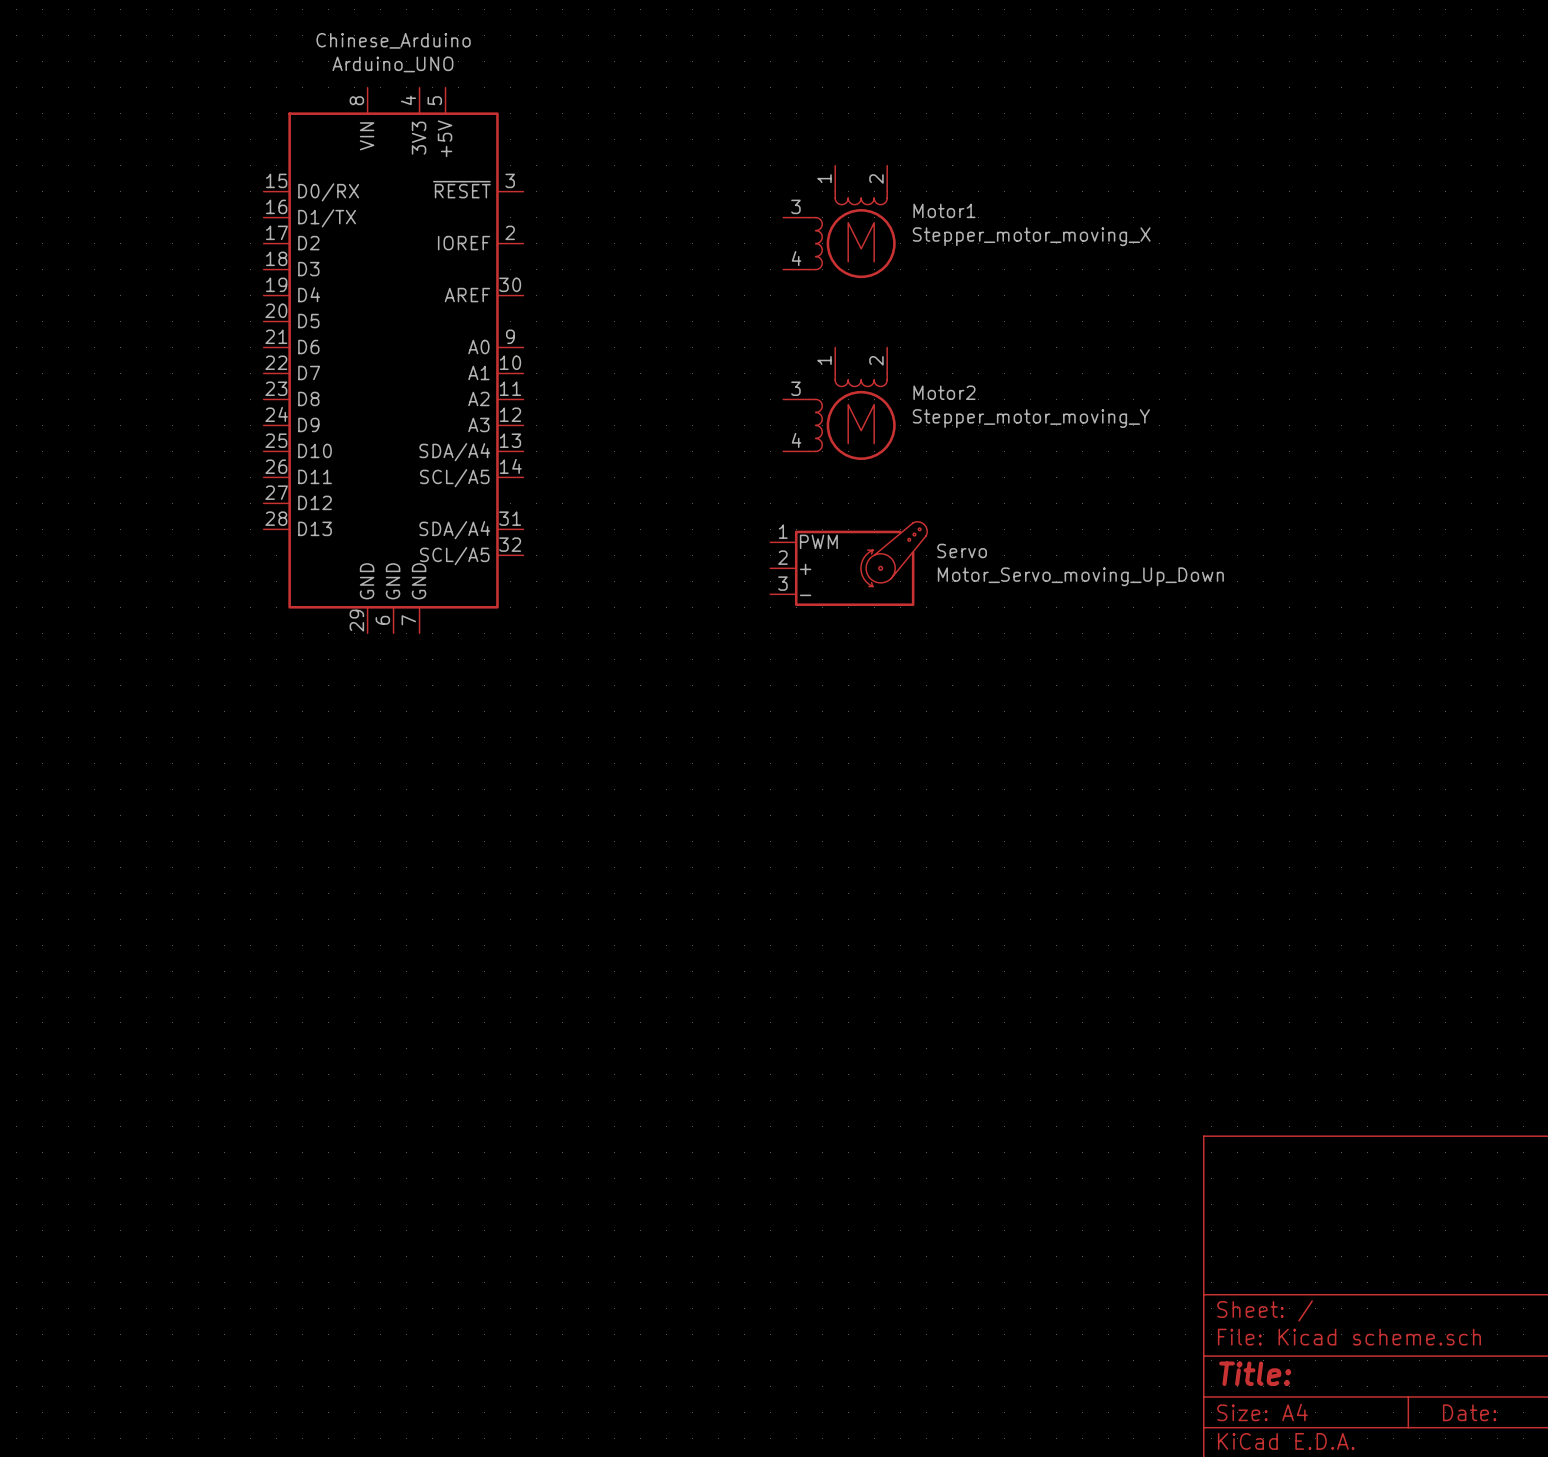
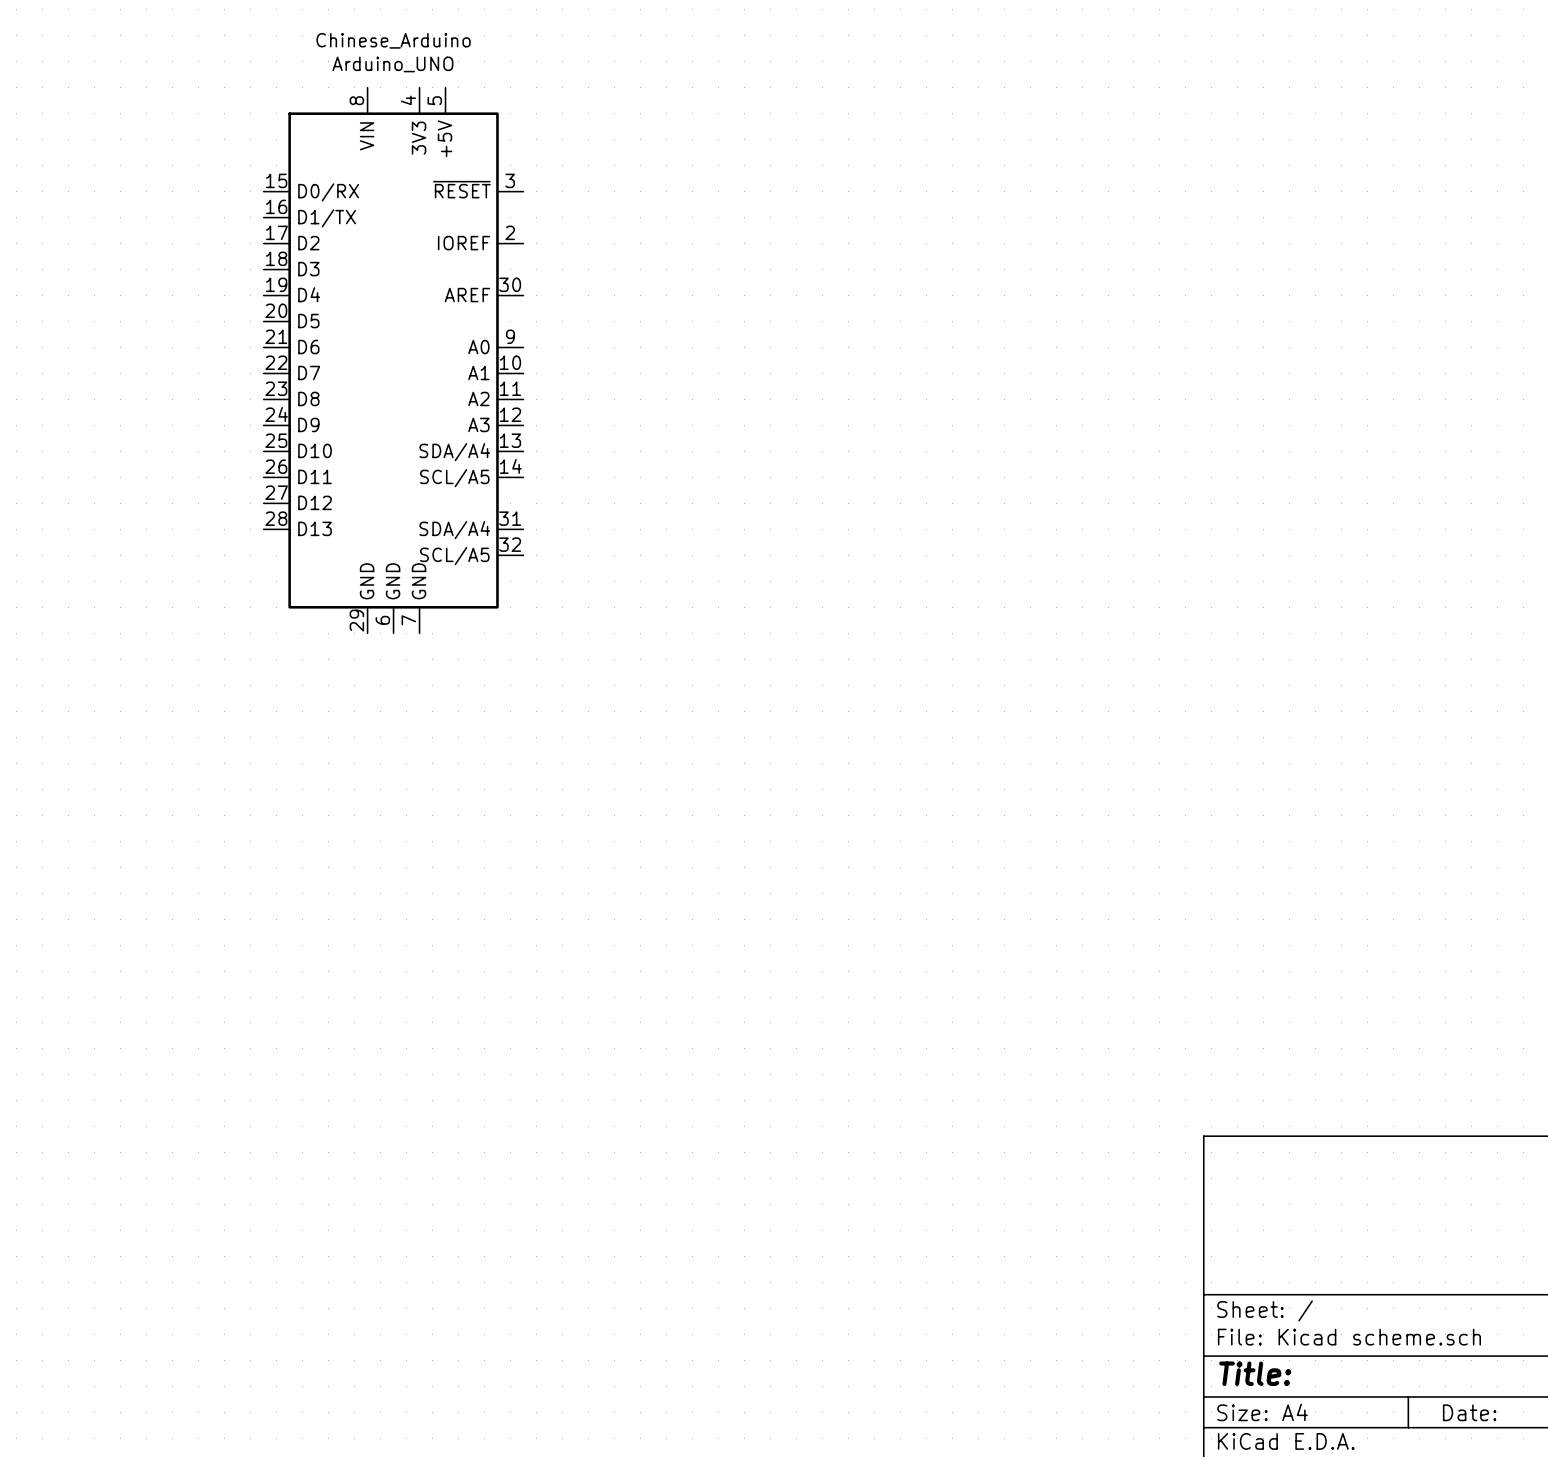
Motor1: Stepper_motor_moving_X (839, 221) -> none
Motor2: Stepper_motor_moving_Y (839, 403) -> none
Servo: Motor_Servo_moving_Up_Down (848, 563) -> none

